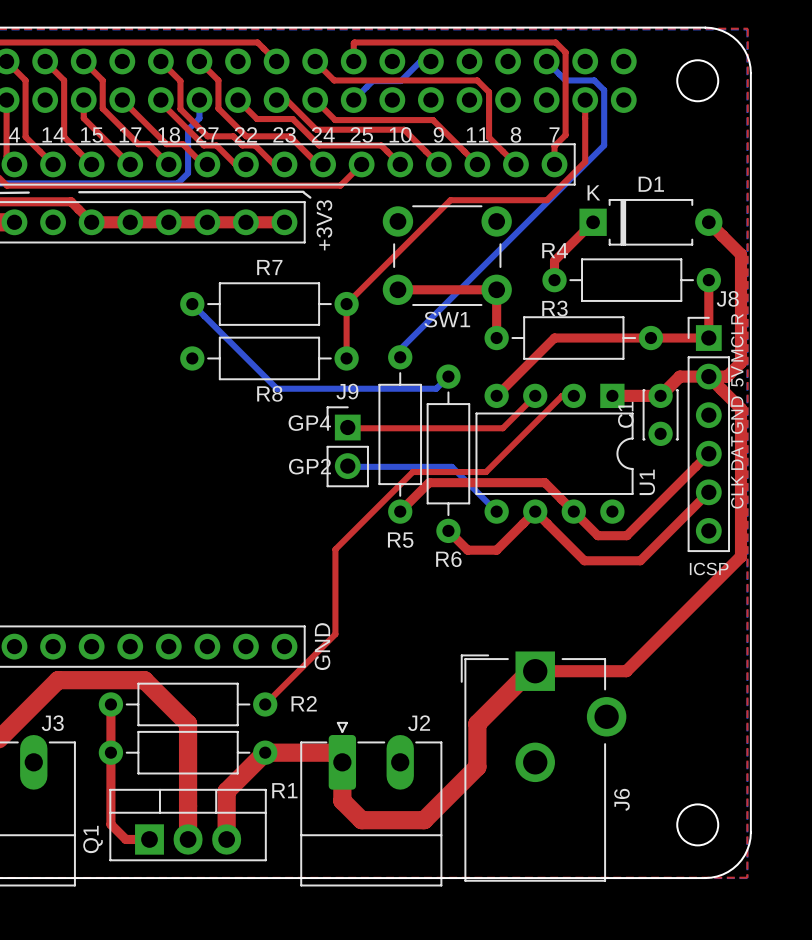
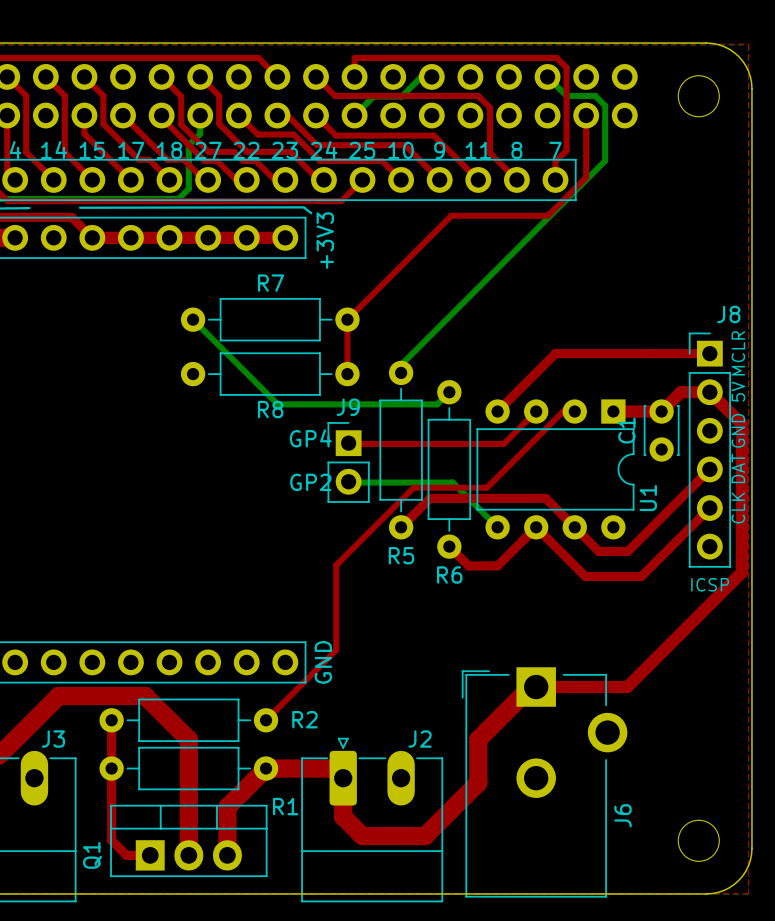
top track: (593, 222) (554, 260) (554, 280) -> none
D1: (650, 222) -> none
top track: (708, 222) (741, 254) (741, 362) (727, 376) (708, 376) -> none
SW1: (447, 255) -> none
R4: (631, 280) -> none
top track: (708, 280) (708, 338) -> none
top track: (397, 289) (496, 289) (496, 338) -> none
R3: (573, 338) -> none

